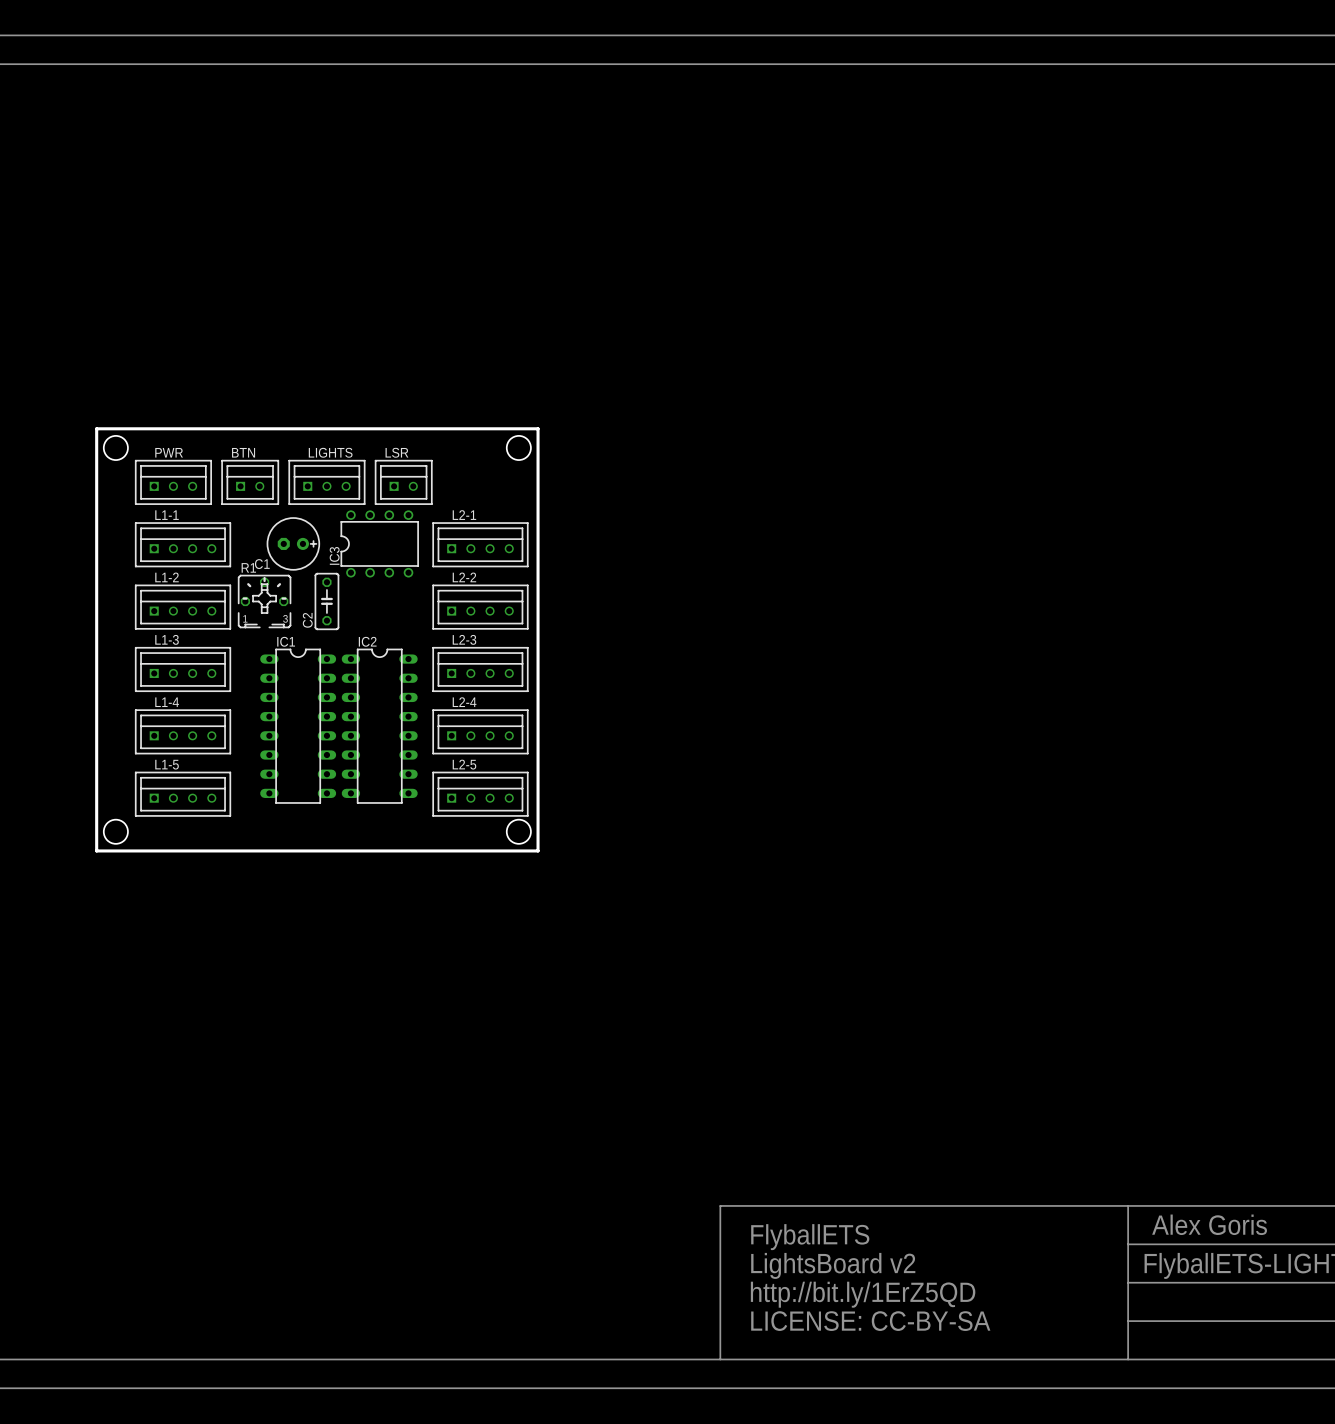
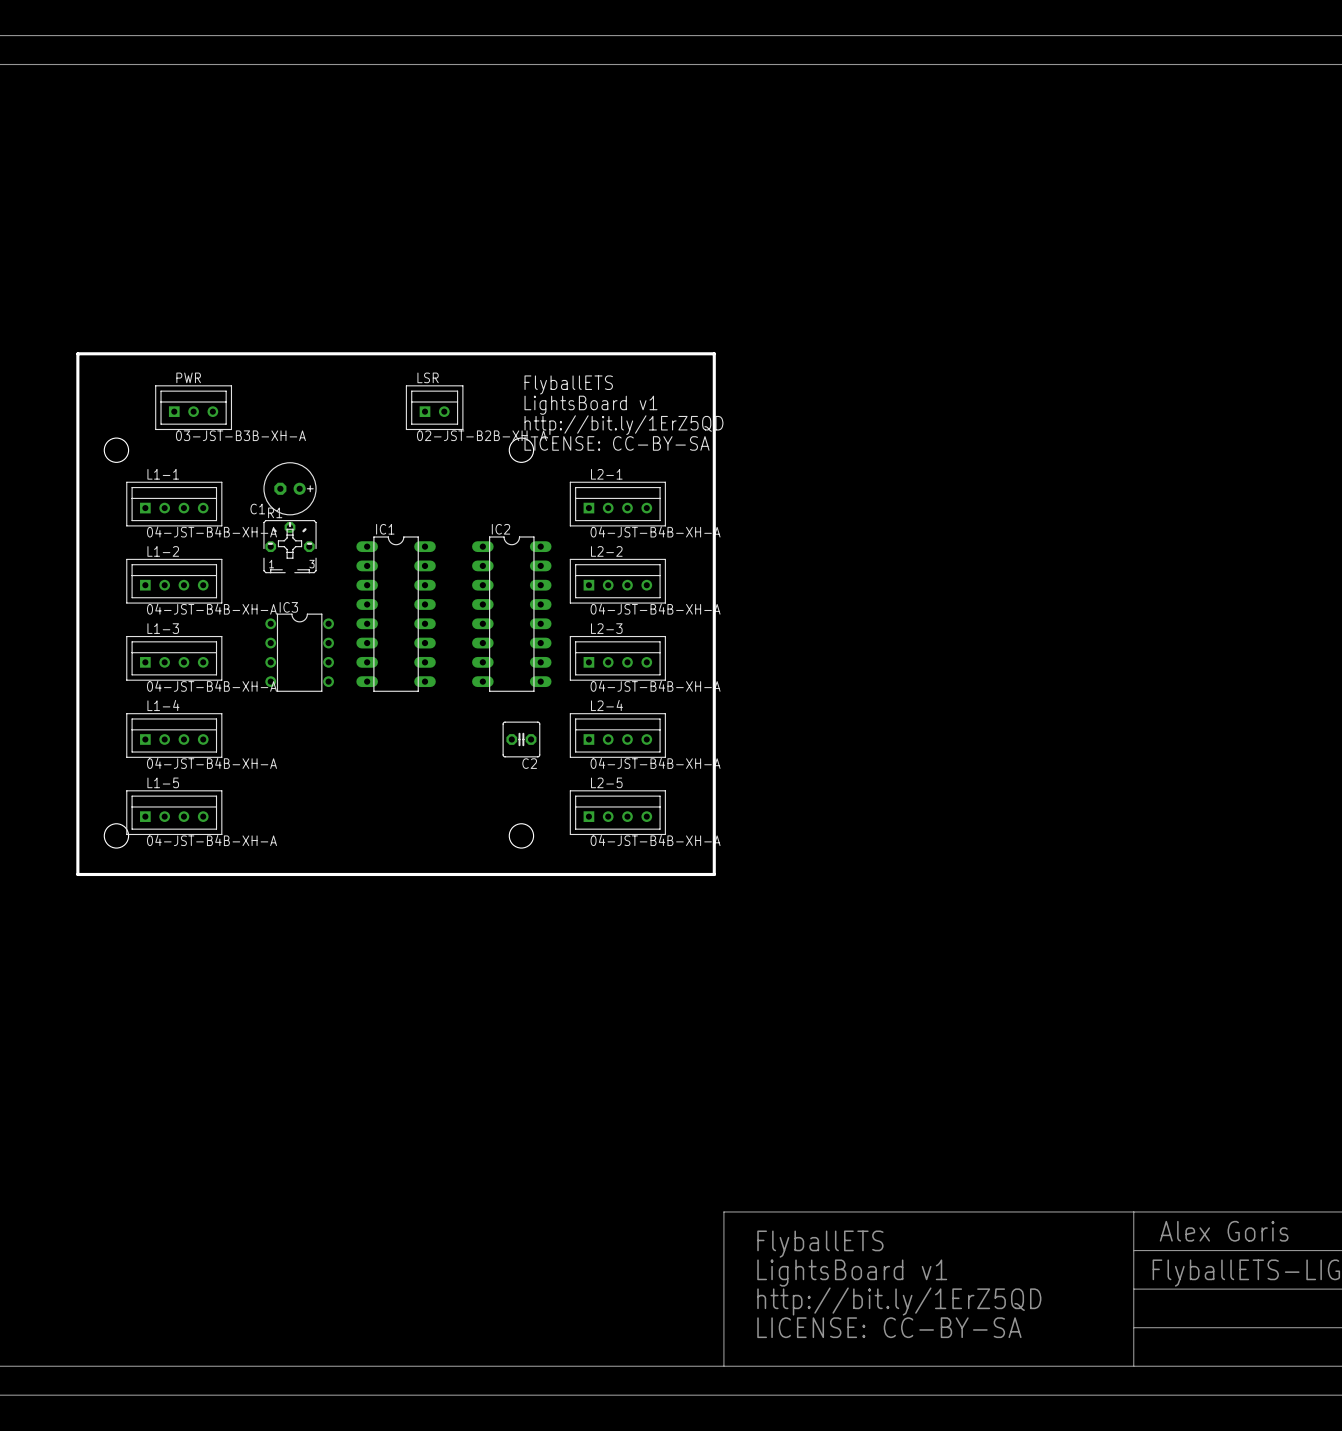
text: none -> FlyballETS (568, 384)
text: none -> LightsBoard v1 (590, 405)
PWR: none -> 03-JST-B3B-XH-A (193, 407)
LSR: none -> 02-JST-B2B-XH-A (434, 407)
text: none -> http://bit.ly/1ErZ5QD (623, 425)
board edge: (96, 428) (538, 428) (538, 850) (96, 850) (96, 428) -> (77, 353) (77, 874) (714, 874) (714, 353) (77, 353)
text: none -> LICENSE: CC-BY-SA (617, 443)
PWR: (173, 482) -> none
BTN: (250, 482) -> none
LIGHTS: (326, 482) -> none
LSR: (403, 482) -> none
IC3 footprint: [340, 510, 419, 578] -> [265, 613, 334, 692]
L1-1 footprint: [135, 522, 231, 567] -> [126, 481, 223, 527]
L2-1 footprint: [432, 522, 529, 567] -> [569, 481, 666, 527]
L1-1 value: none -> 04-JST-B4B-XH-A (211, 531)
L2-1 value: none -> 04-JST-B4B-XH-A (655, 531)
C1 position: (293, 543) -> (290, 488)
IC3 name position: IC3 (334, 555) -> IC3 (288, 607)
C2 footprint: [314, 573, 340, 630] -> [502, 721, 541, 758]
R1 footprint: [238, 575, 292, 628] -> [263, 520, 317, 574]
L1-2 footprint: [135, 584, 231, 630] -> [126, 558, 223, 604]
L2-2 footprint: [432, 584, 529, 630] -> [569, 558, 666, 604]
L1-2 value: none -> 04-JST-B4B-XH-A (211, 609)
L2-2 value: none -> 04-JST-B4B-XH-A (655, 609)
C2 name position: C2 (307, 620) -> C2 (529, 763)
L1-3 footprint: [135, 647, 231, 692] -> [126, 636, 223, 681]
L2-3 footprint: [432, 647, 529, 692] -> [569, 636, 666, 681]
IC1 footprint: [260, 648, 337, 804] -> [356, 536, 436, 692]
IC2 footprint: [341, 648, 418, 804] -> [472, 536, 552, 692]
L1-3 value: none -> 04-JST-B4B-XH-A (211, 686)
L2-3 value: none -> 04-JST-B4B-XH-A (655, 686)
L1-4 footprint: [135, 709, 231, 755] -> [126, 713, 223, 758]
L2-4 footprint: [432, 709, 529, 755] -> [569, 713, 666, 758]
L1-4 value: none -> 04-JST-B4B-XH-A (211, 763)
L2-4 value: none -> 04-JST-B4B-XH-A (655, 763)
L1-5 footprint: [135, 772, 231, 817] -> [126, 790, 223, 835]
L2-5 footprint: [432, 772, 529, 817] -> [569, 790, 666, 835]
L1-5 value: none -> 04-JST-B4B-XH-A (211, 840)
L2-5 value: none -> 04-JST-B4B-XH-A (655, 840)
text: LightsBoard v2 (833, 1265) -> LightsBoard v1 (852, 1273)

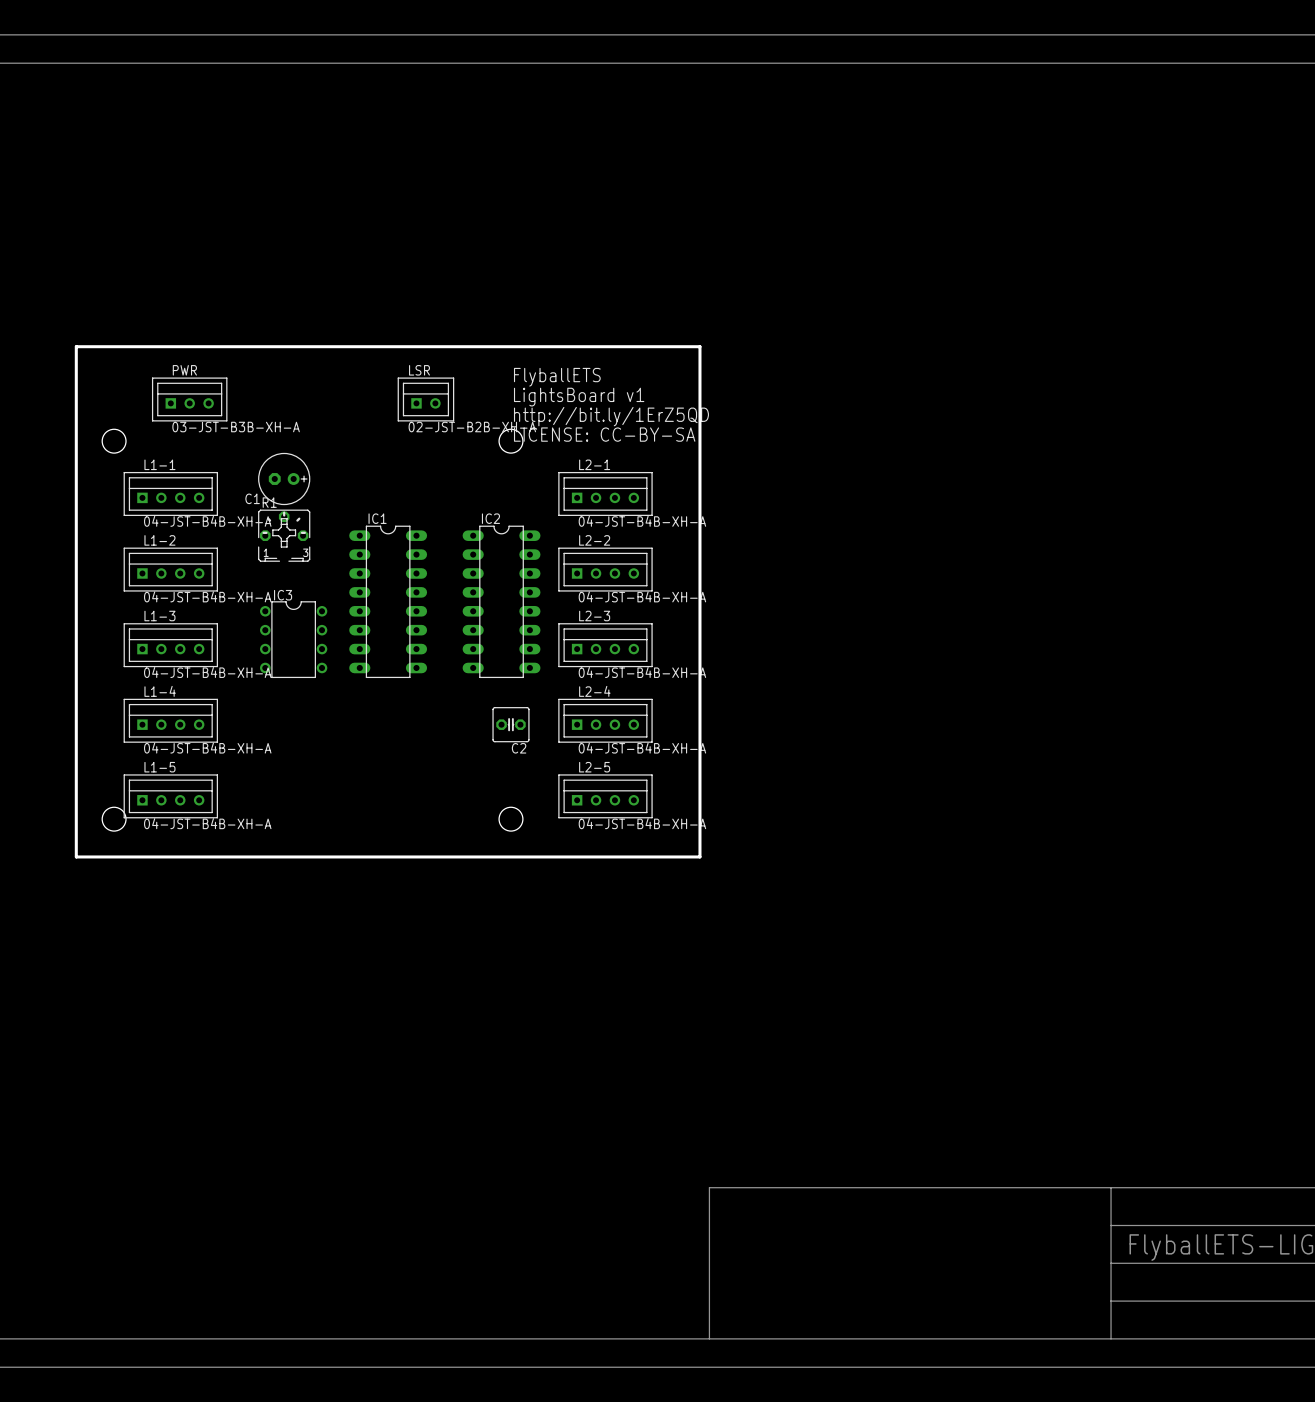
text: Alex Goris (1224, 1231) -> none
text: FlyballETS (820, 1244) -> none
text: LightsBoard v1 (852, 1273) -> none
text: http://bit.ly/1ErZ5QD (899, 1301) -> none
text: LICENSE: CC-BY-SA (889, 1327) -> none

